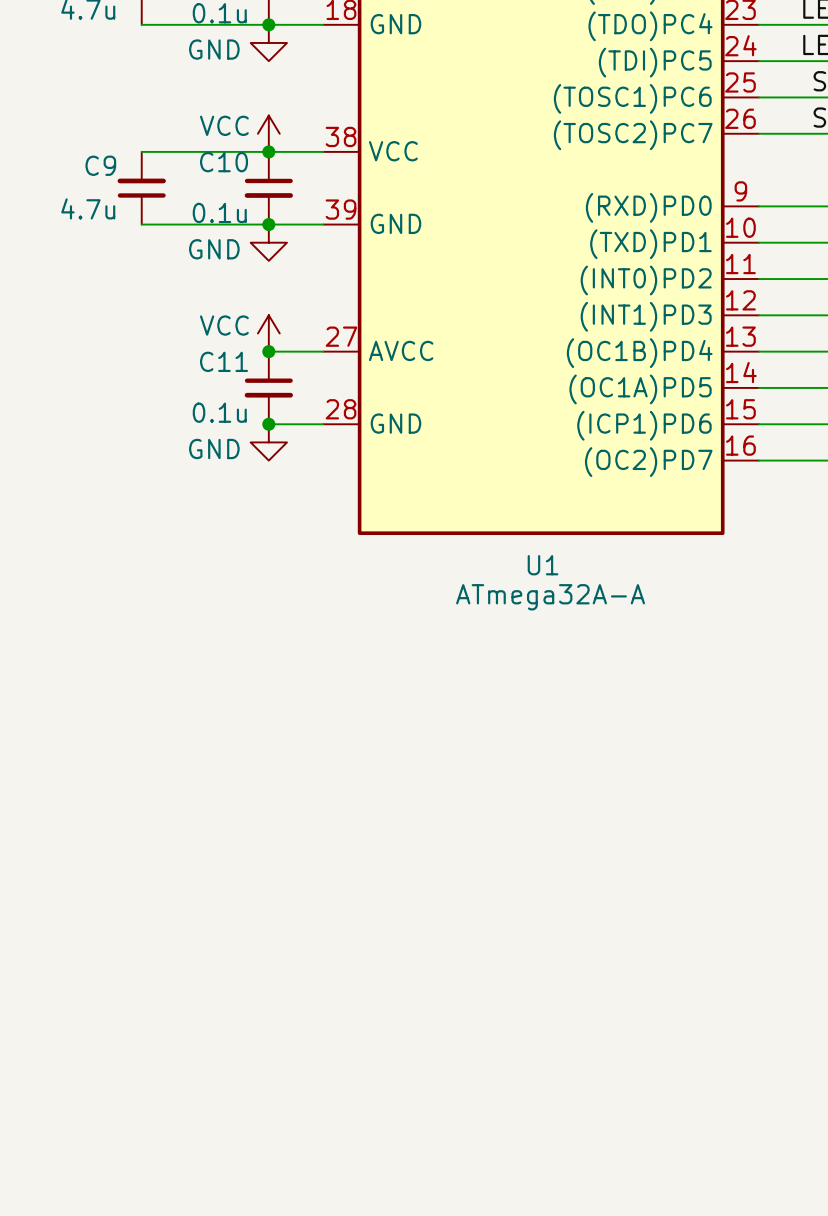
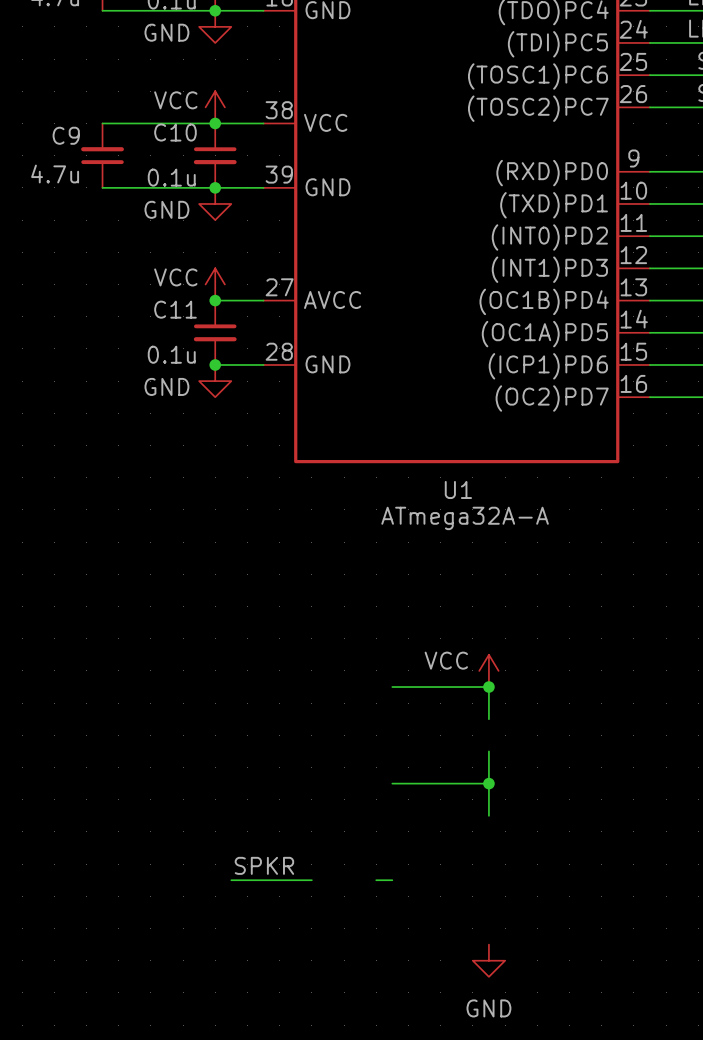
power symbol: none -> VCC (488, 670)
wire: none -> (392, 687) (488, 687) (488, 719)
junction: none -> (488, 687)
wire: none -> (488, 751) (488, 815)
wire: none -> (392, 783) (488, 783)
junction: none -> (488, 783)
label: none -> SPKR (264, 865)
wire: none -> (231, 880) (311, 880)
wire: none -> (376, 880) (392, 880)
power symbol: none -> GND (488, 960)

